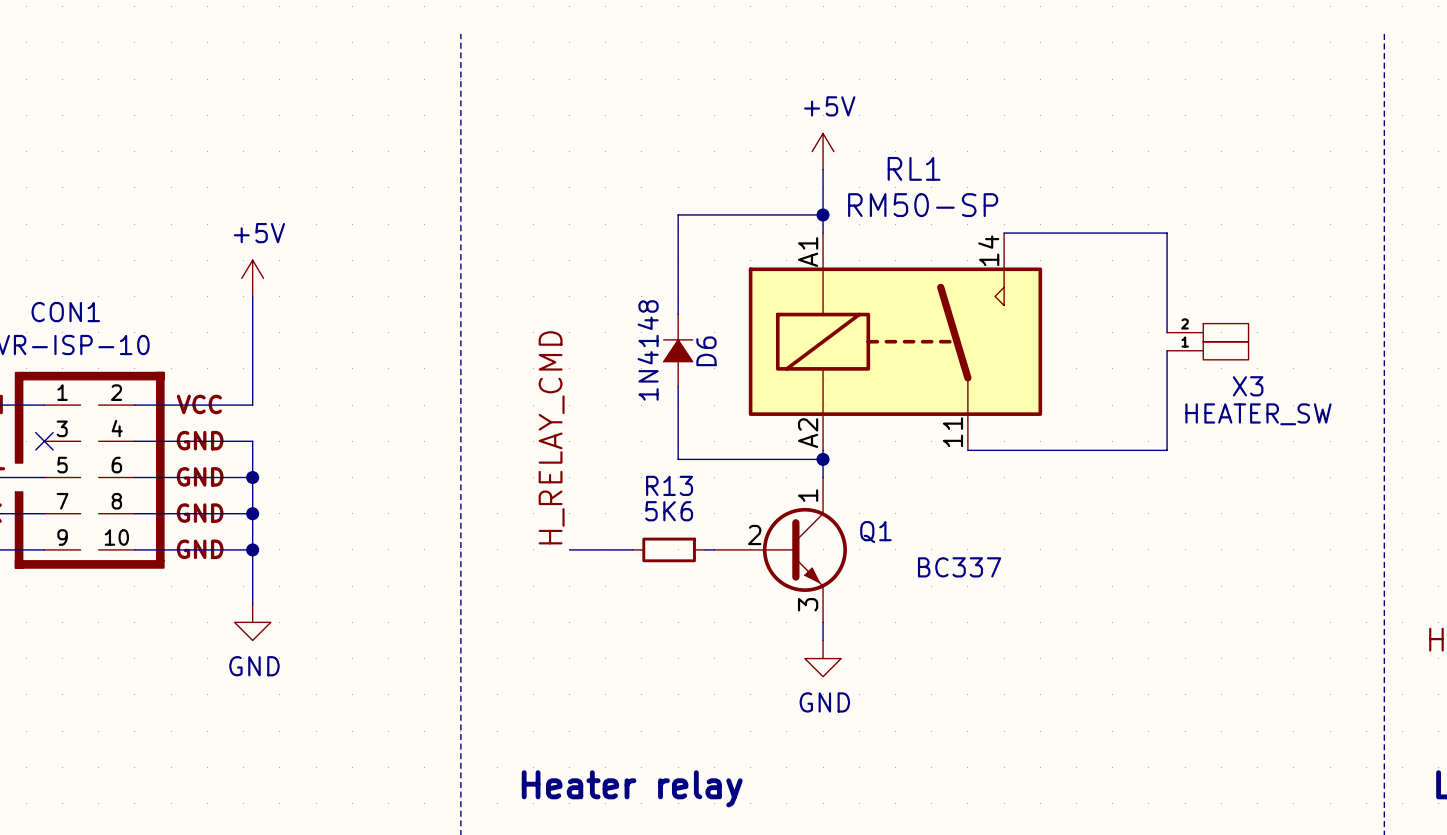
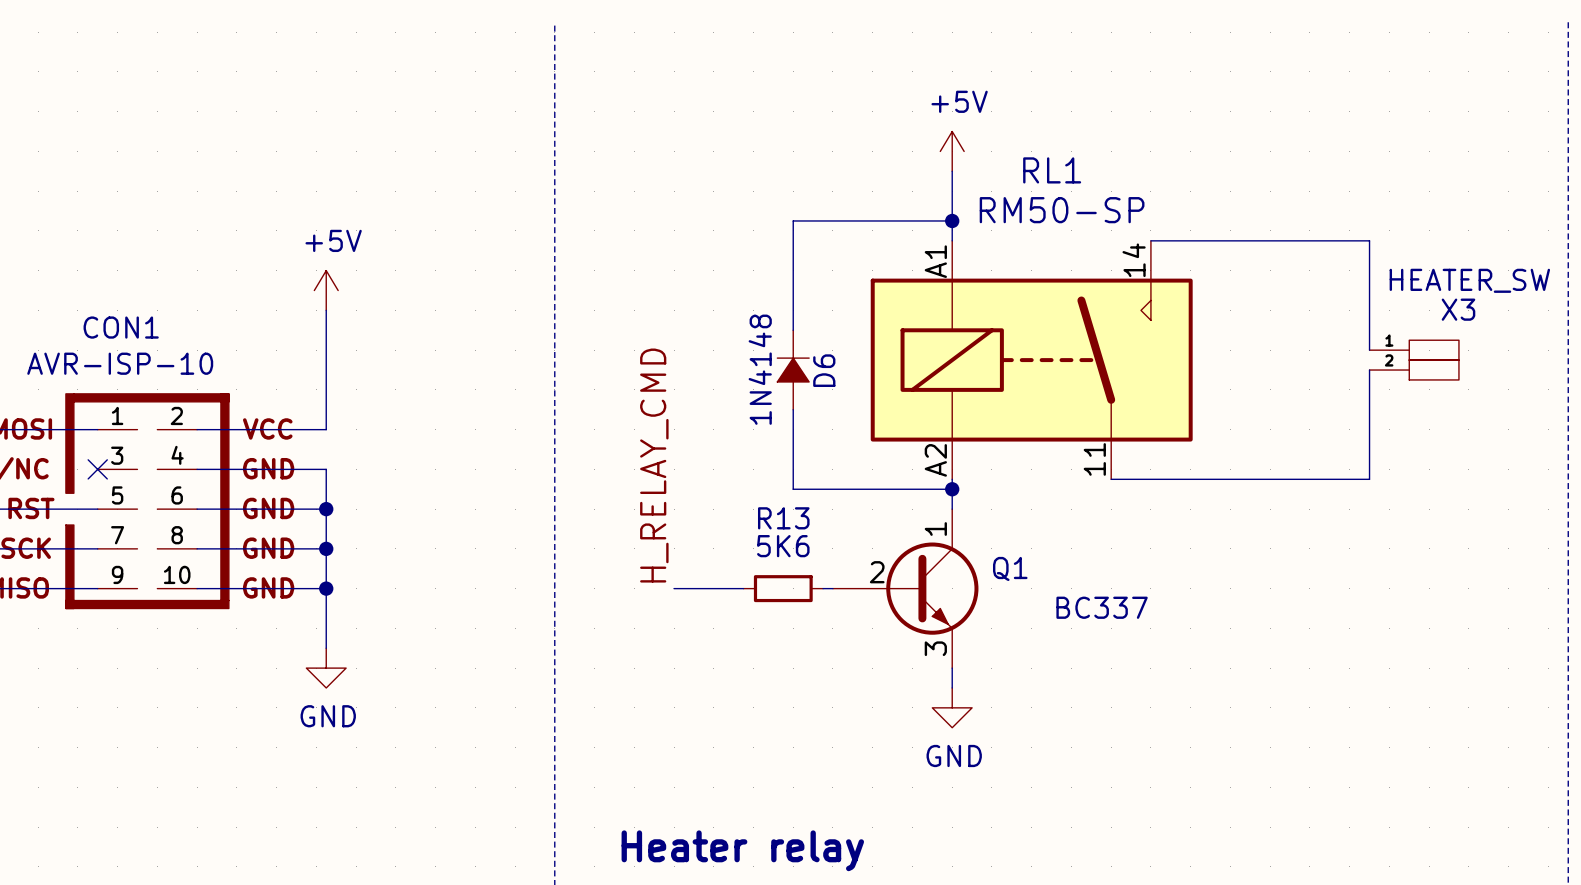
wire: (1167, 233) (1167, 332) -> (1329, 240) (1369, 240) (1369, 350)
X3 flip: as is (1225, 341) -> up-down (1434, 360)
wire: (1167, 350) (1167, 450) -> (1369, 370) (1369, 479) (1329, 479)

